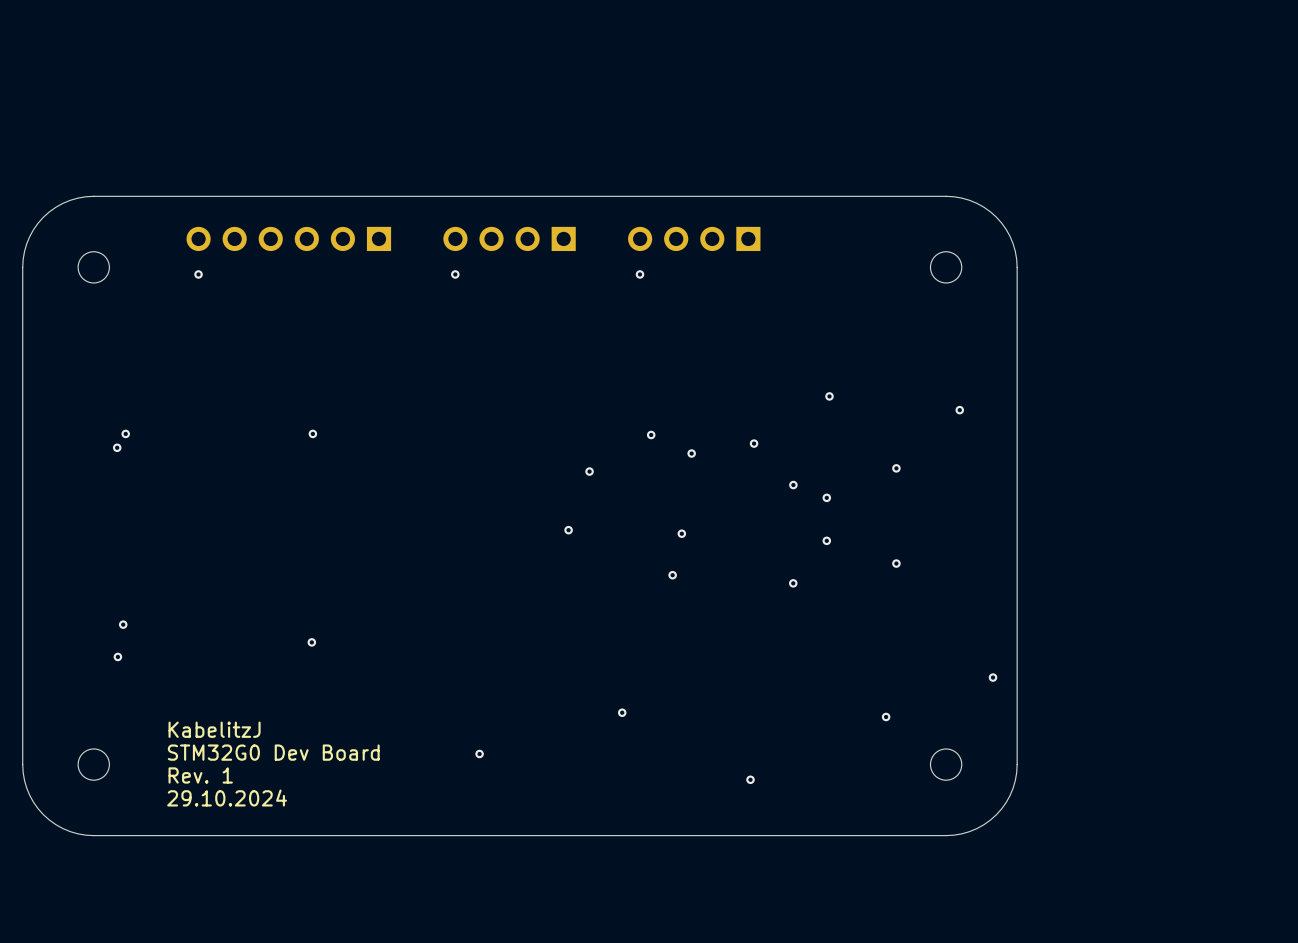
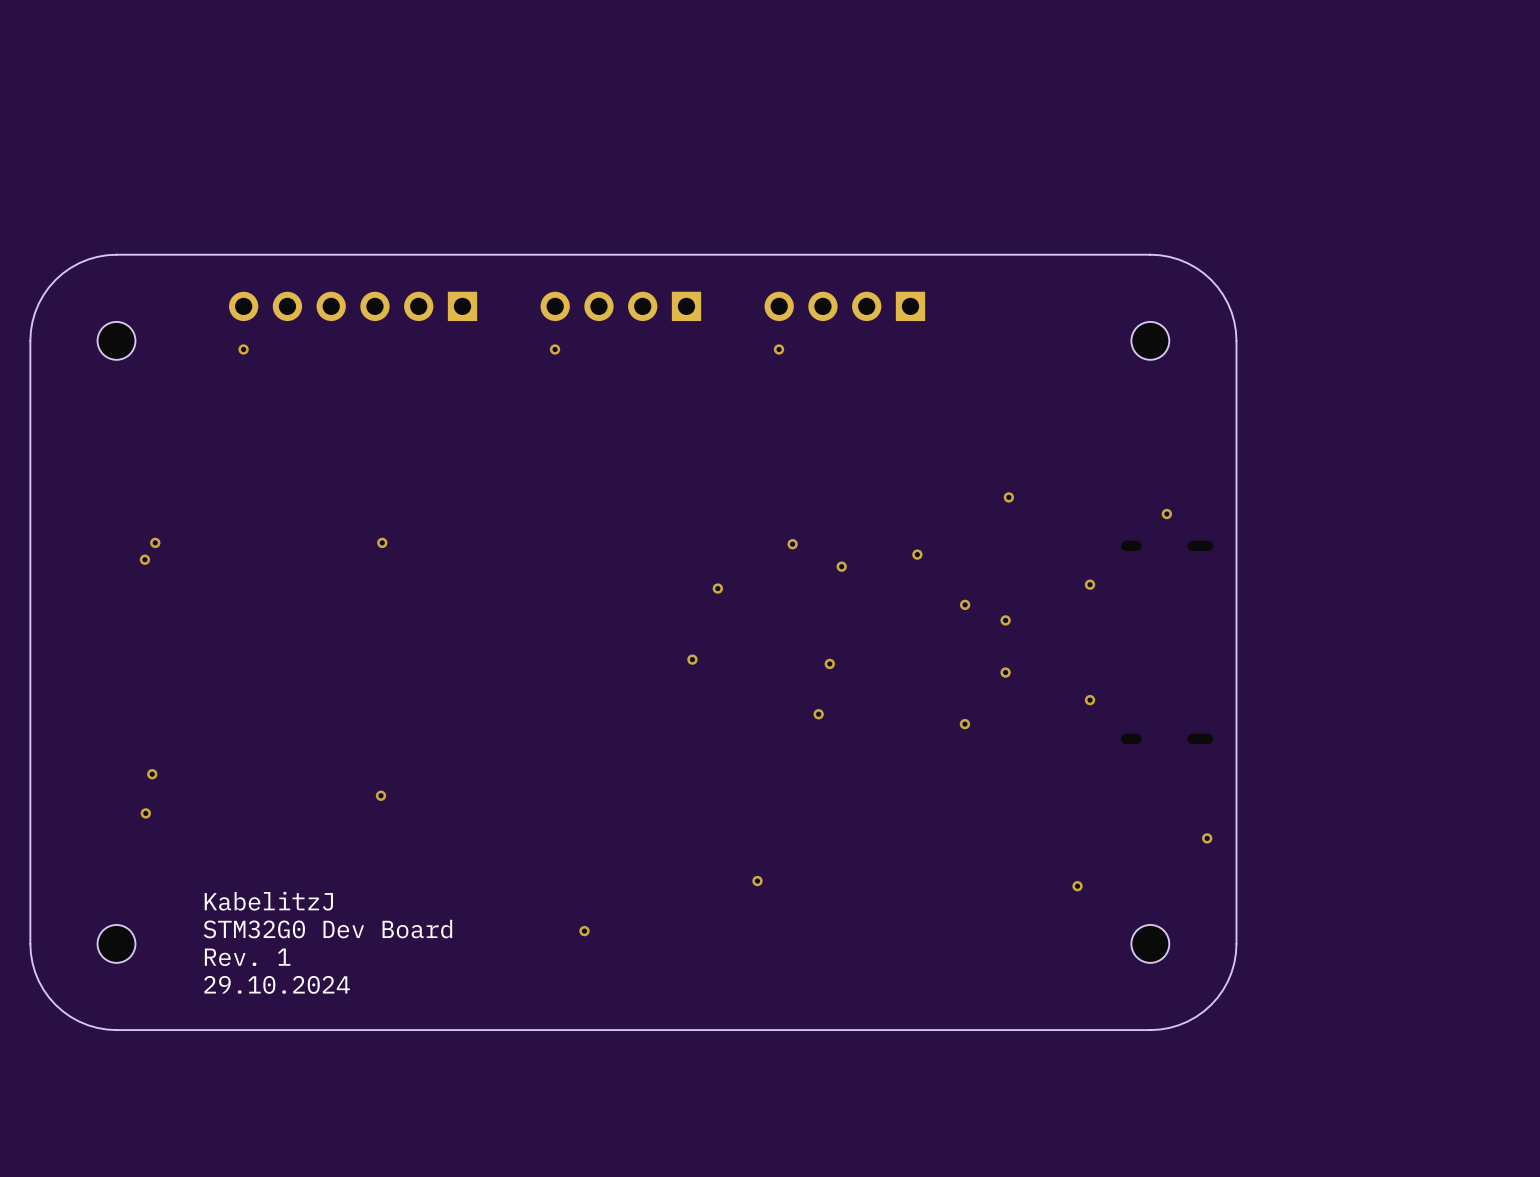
via: (750, 779) -> none

